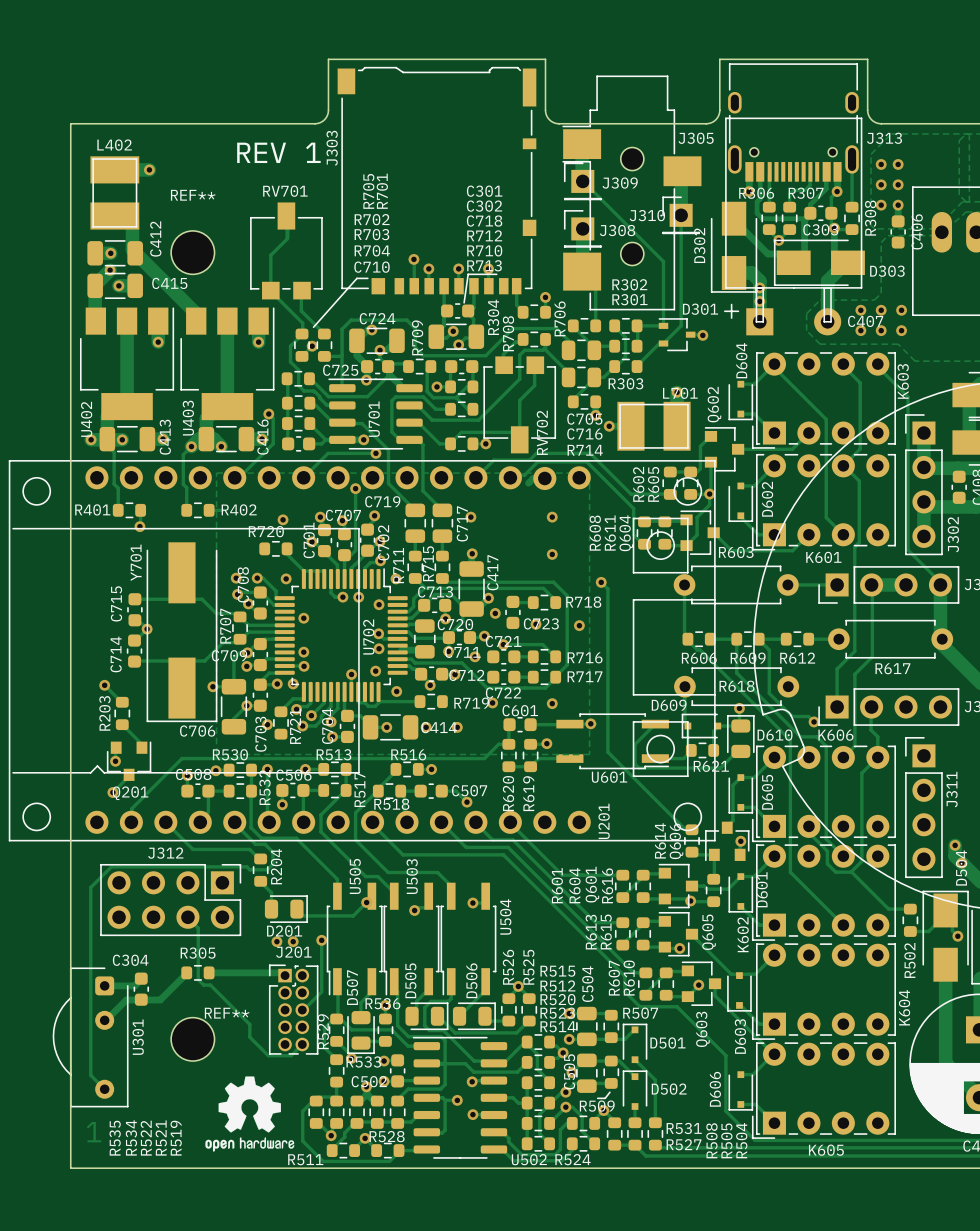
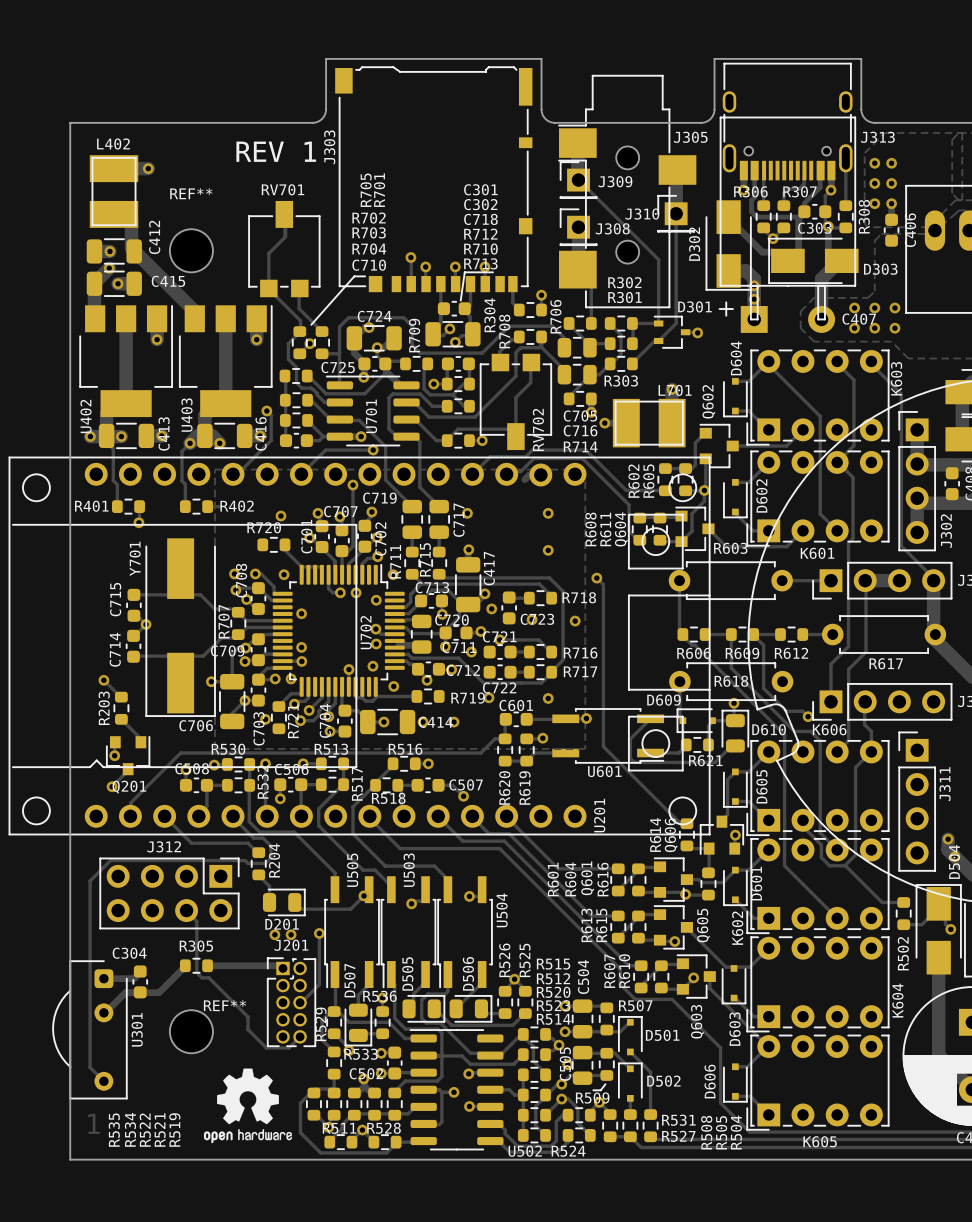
R511 name position: R511 (305, 1159) -> R511 (339, 1128)

